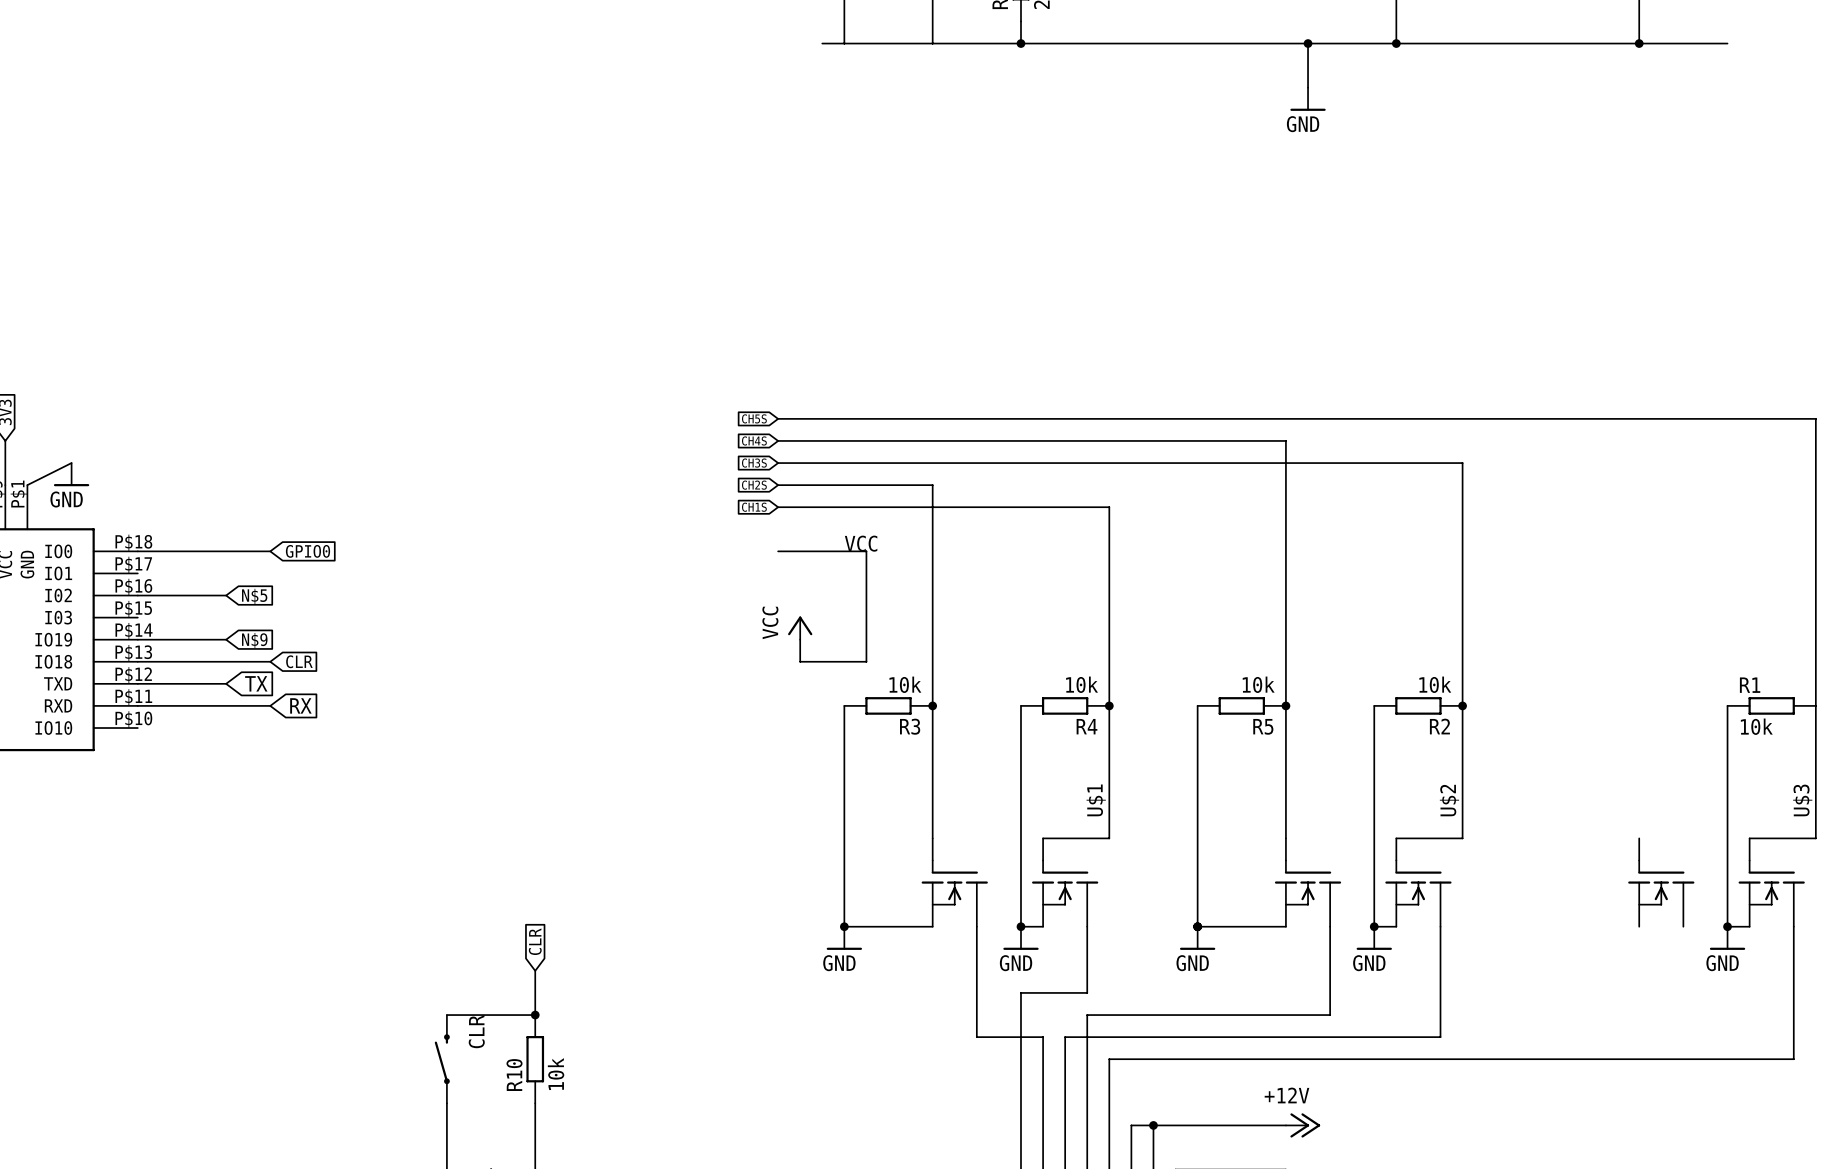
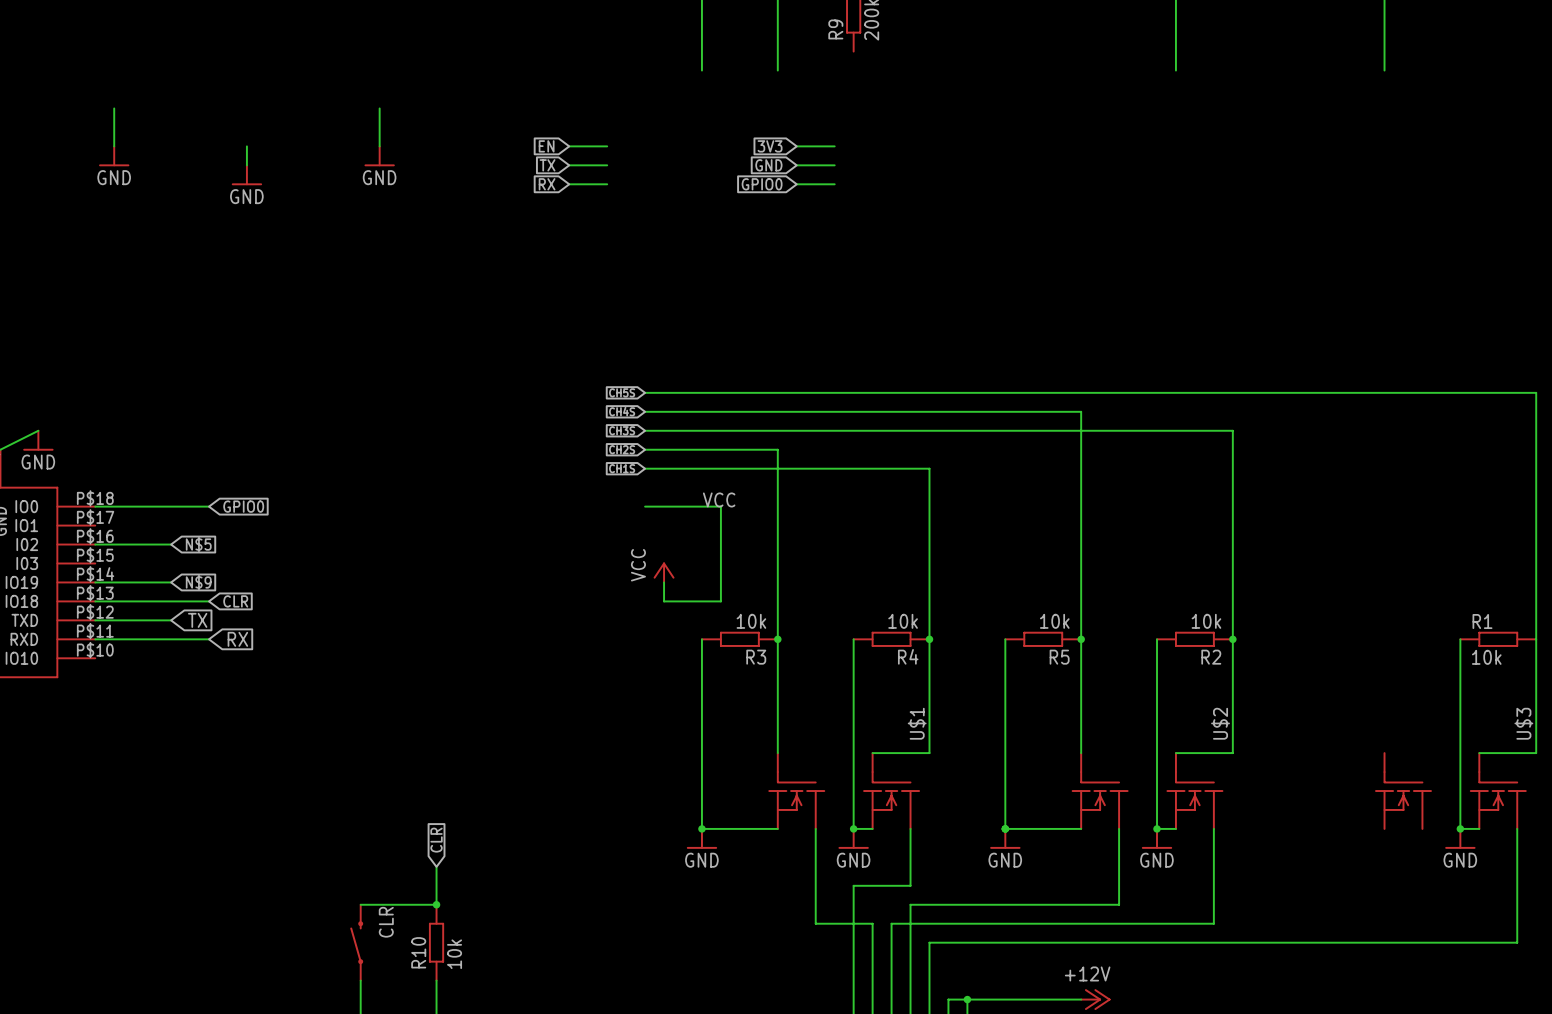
wire: (1020, 21) (1020, 43) -> none
wire: (822, 43) (1727, 43) -> none
junction: (1020, 43) -> none
wire: (1308, 43) (1308, 87) -> none
junction: (1308, 43) -> none
junction: (1396, 43) -> none
junction: (1639, 43) -> none
wire: none -> (114, 108) (114, 146)
wire: none -> (379, 108) (379, 146)
power symbol: GND (1308, 99) -> none
wire: none -> (246, 146) (246, 165)
global label: none -> EN (546, 146)
wire: none -> (569, 146) (607, 146)
global label: none -> 3V3 (770, 146)
wire: none -> (796, 146) (834, 146)
power symbol: none -> GND (114, 156)
power symbol: none -> GND (379, 156)
global label: none -> TX (547, 165)
wire: none -> (569, 165) (607, 165)
global label: none -> GND (768, 165)
wire: none -> (796, 165) (834, 165)
power symbol: none -> GND (246, 175)
global label: none -> RX (547, 184)
wire: none -> (569, 184) (607, 184)
global label: none -> GPIO0 (762, 184)
wire: none -> (796, 184) (834, 184)

